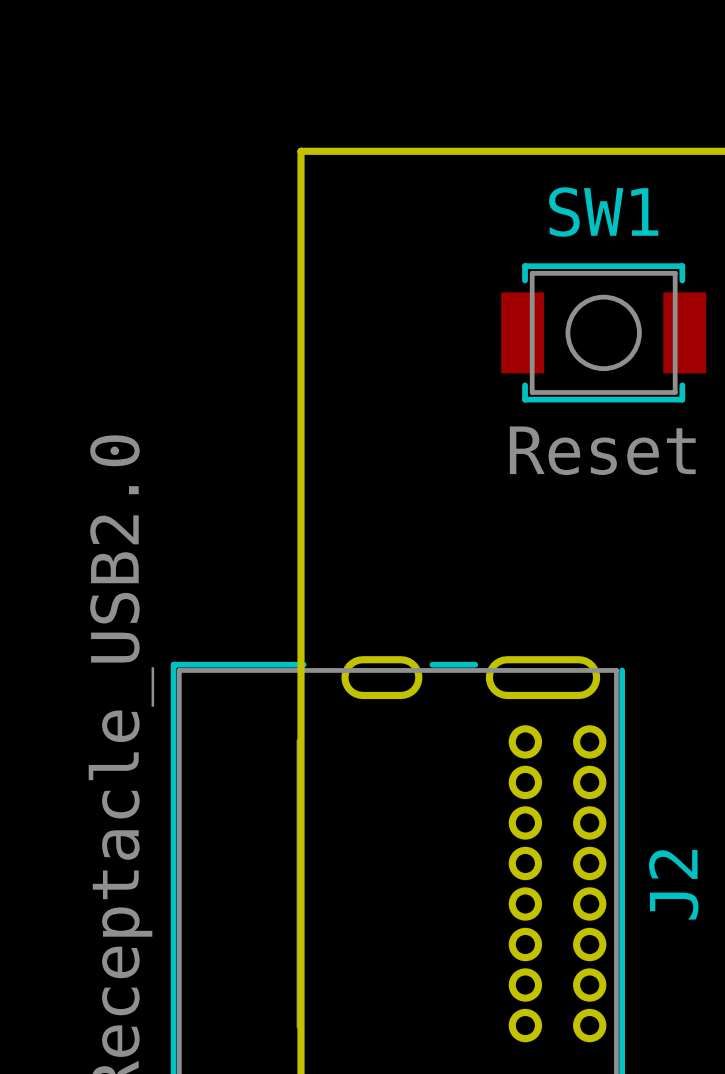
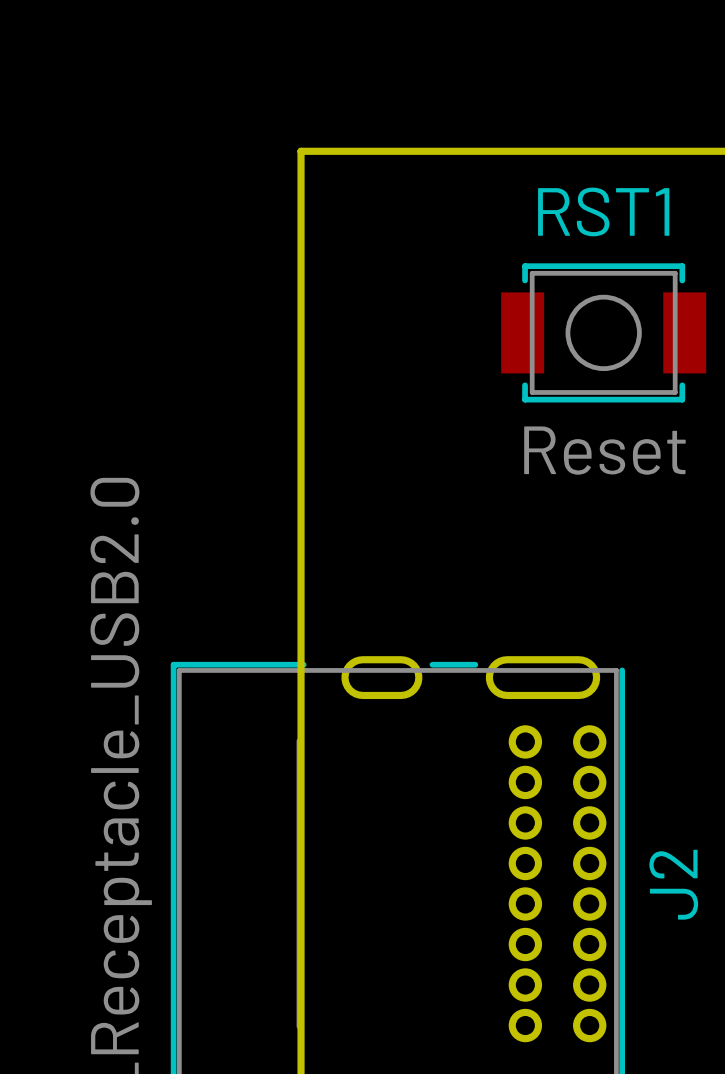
SW1 name: SW1 (603, 211) -> RST1 (603, 211)

